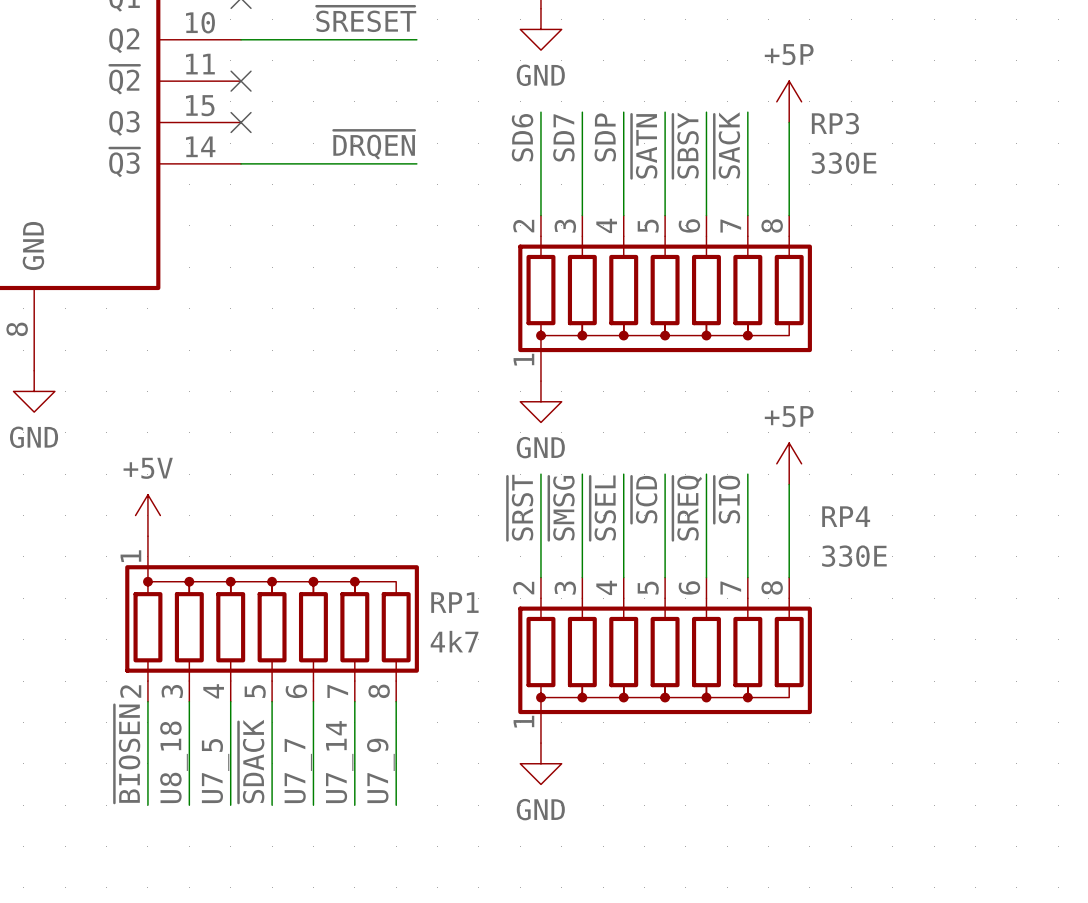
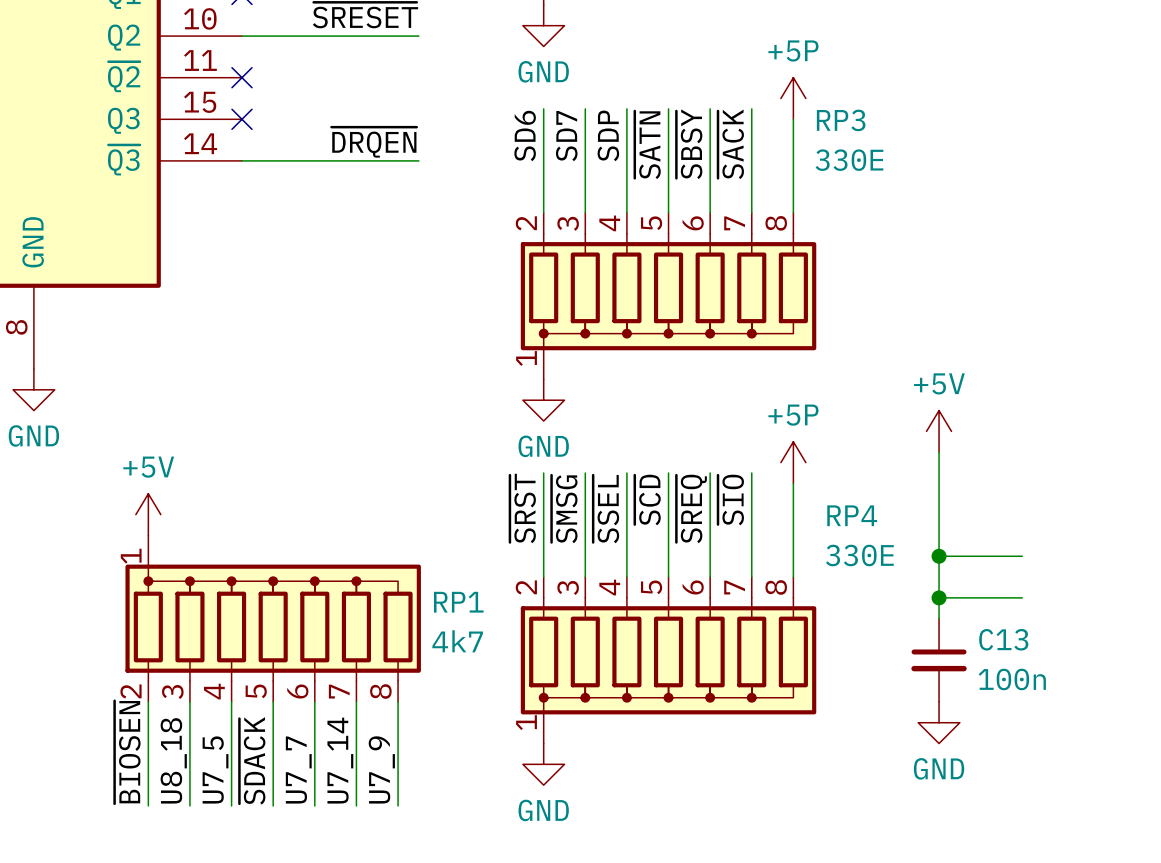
power symbol: none -> +5V (939, 431)
wire: none -> (939, 452) (939, 618)
wire: none -> (939, 556) (1022, 556)
junction: none -> (939, 556)
wire: none -> (939, 597) (1022, 597)
junction: none -> (939, 597)
C13: none -> 100n (939, 660)
power symbol: none -> GND (939, 722)

